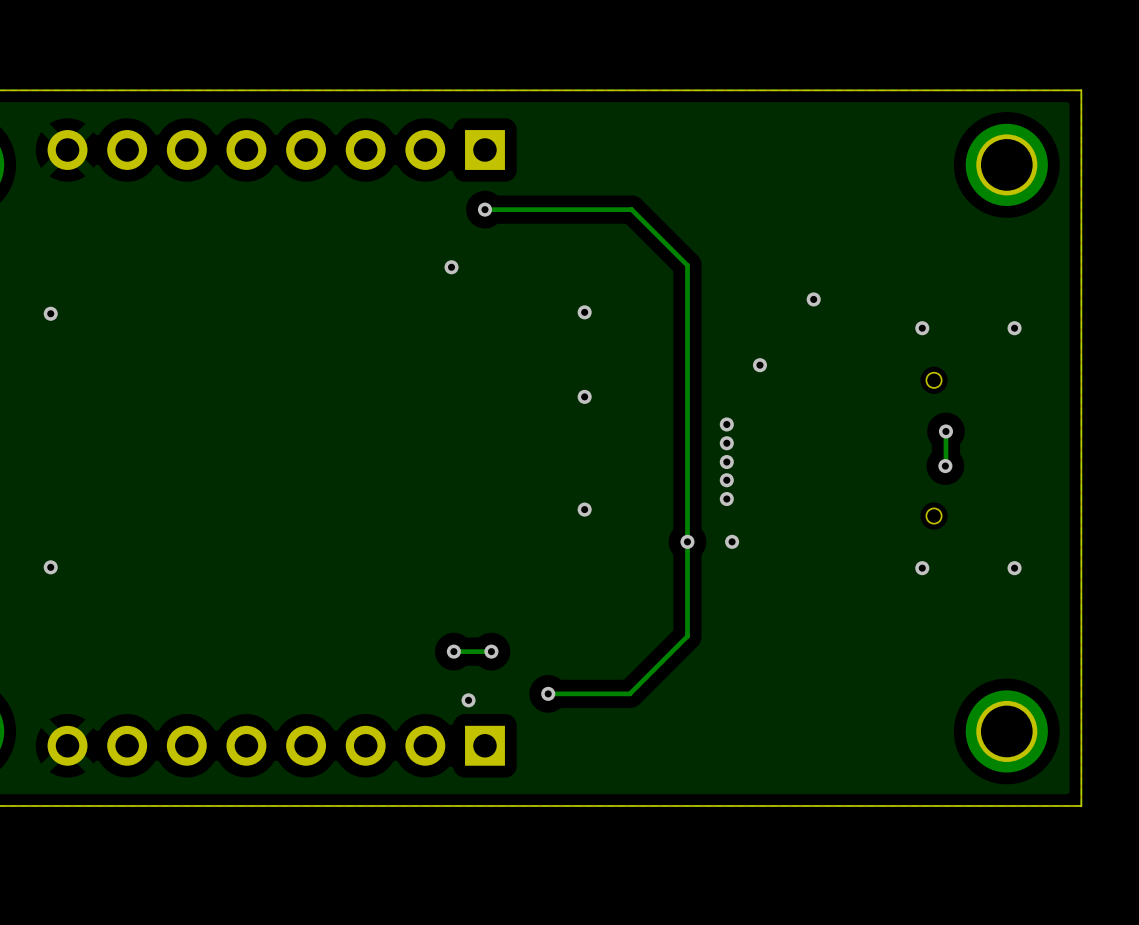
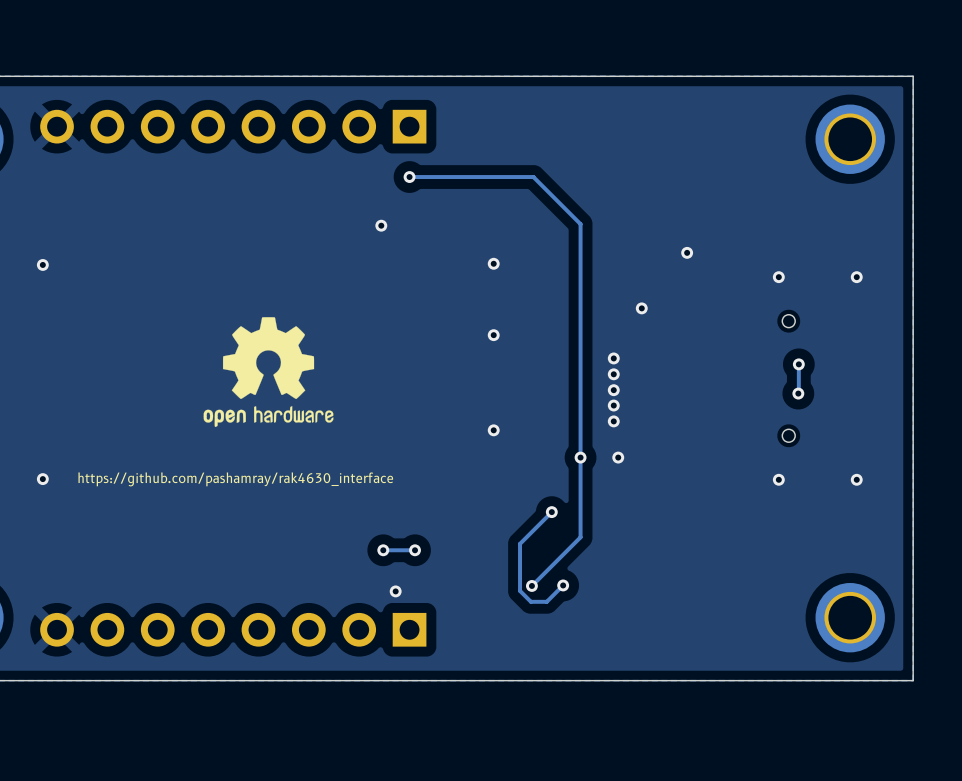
drawing: none -> [203, 317, 334, 427]
text: none -> https://github.com/pashamray/rak4630_interface (235, 479)
track: none -> (551, 512) (520, 543) (520, 590) (530, 601) (546, 601) (563, 585)
via: none -> (551, 512)
via: (548, 693) -> none
track: (629, 693) (548, 693) -> none
via: none -> (531, 585)
via: none -> (563, 585)

